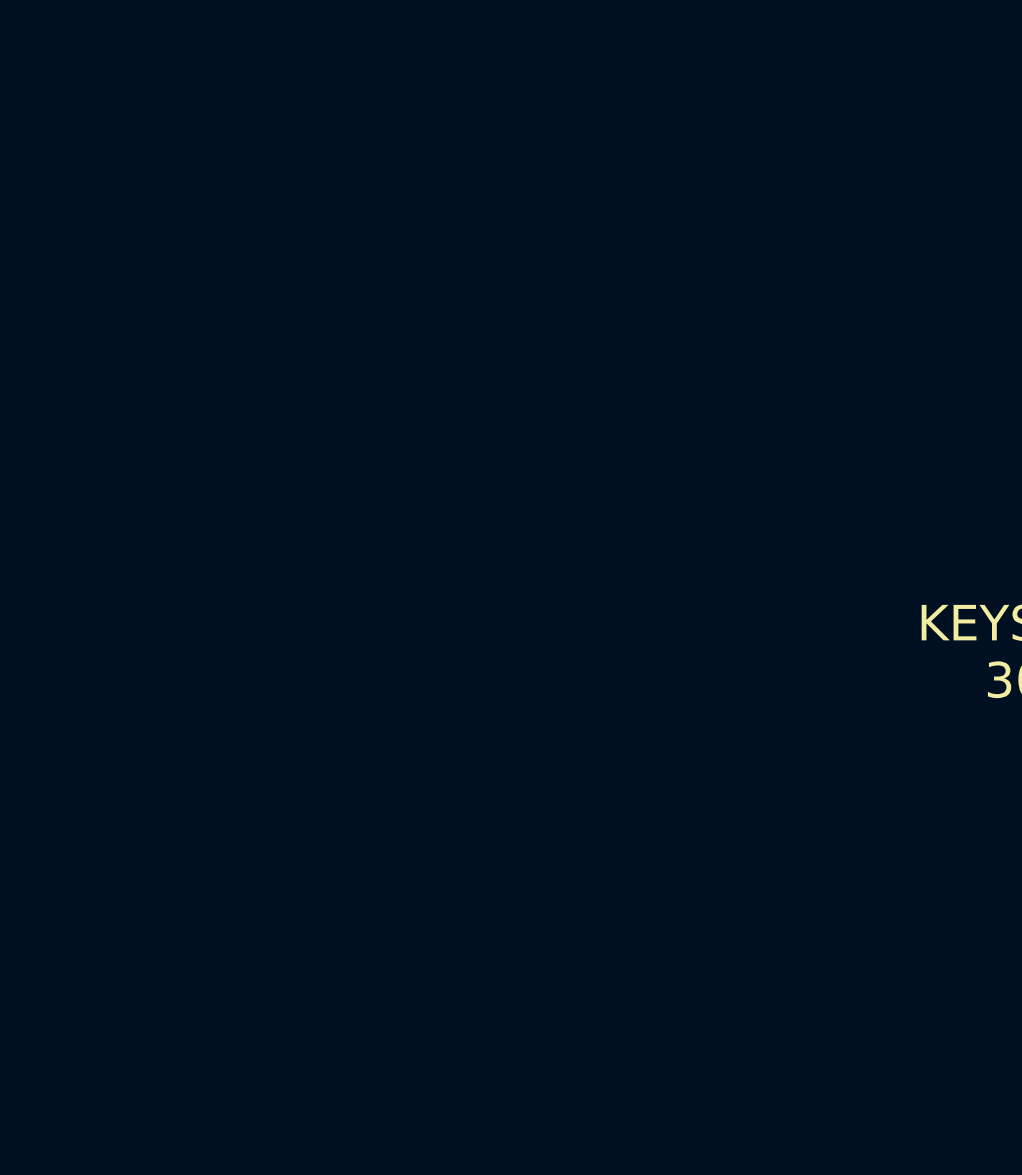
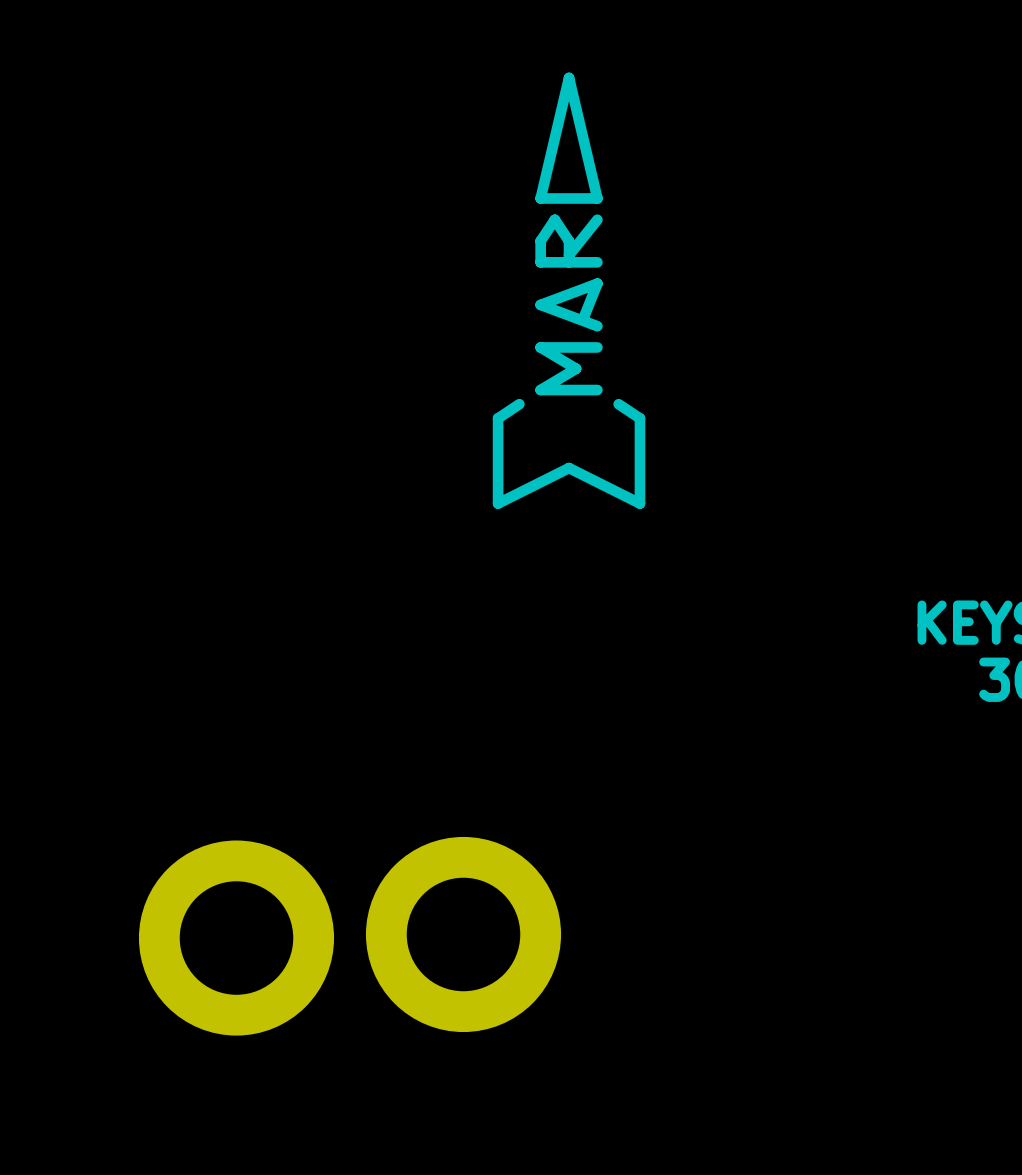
drawing: none -> [492, 72, 646, 509]
part: none -> (463, 934)
part: none -> (236, 938)

